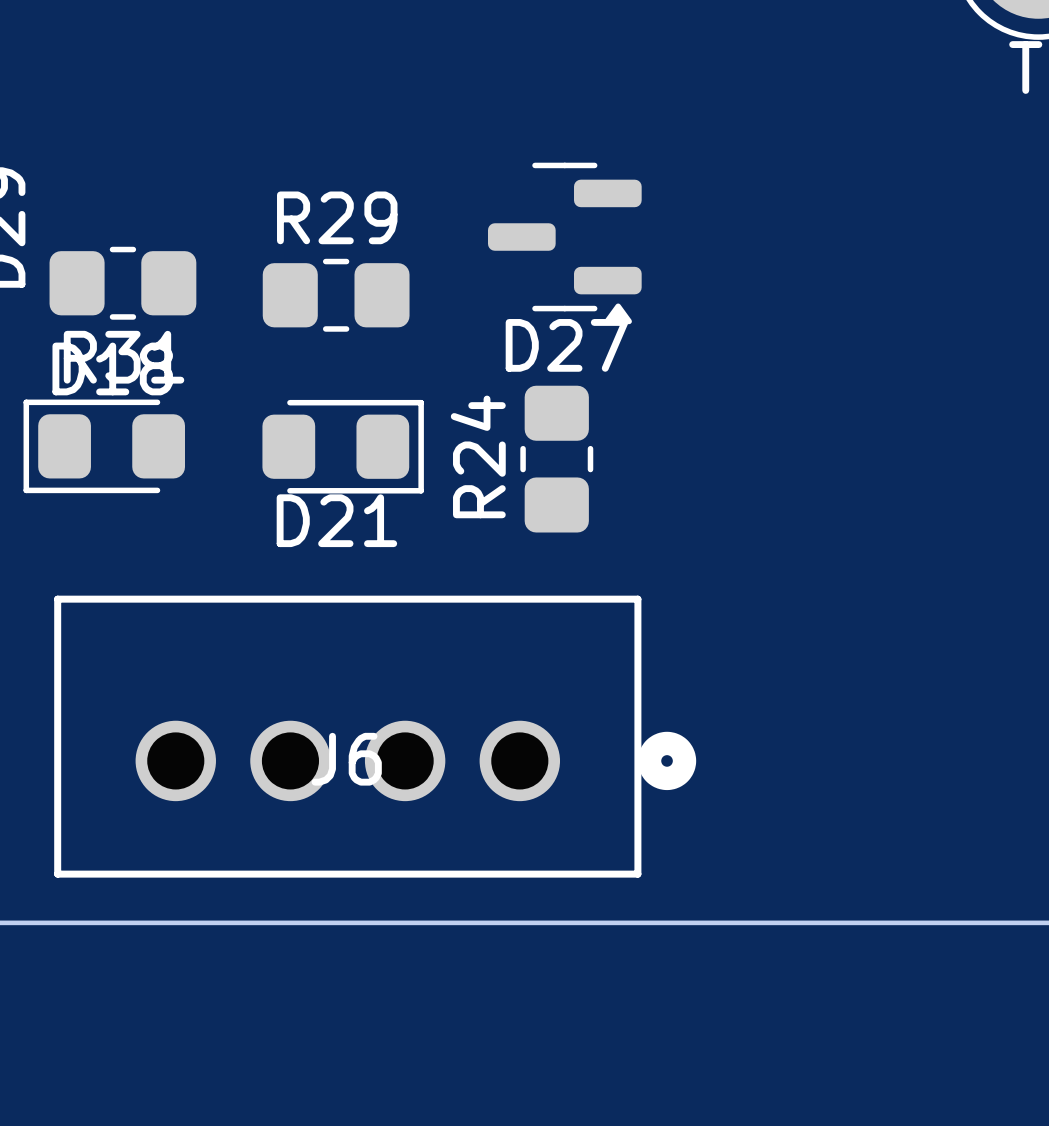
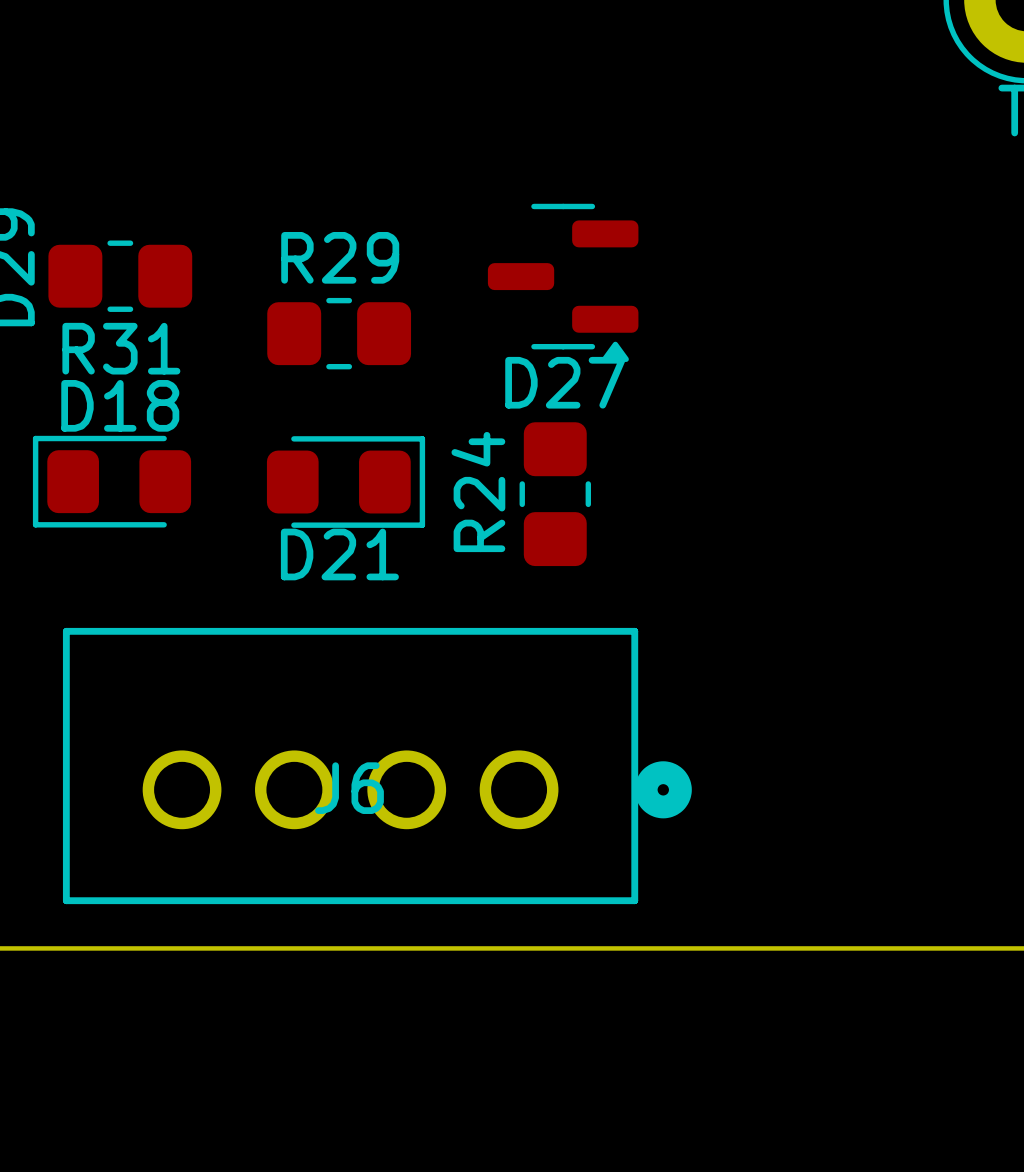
R31 position: (122, 283) -> (120, 276)

